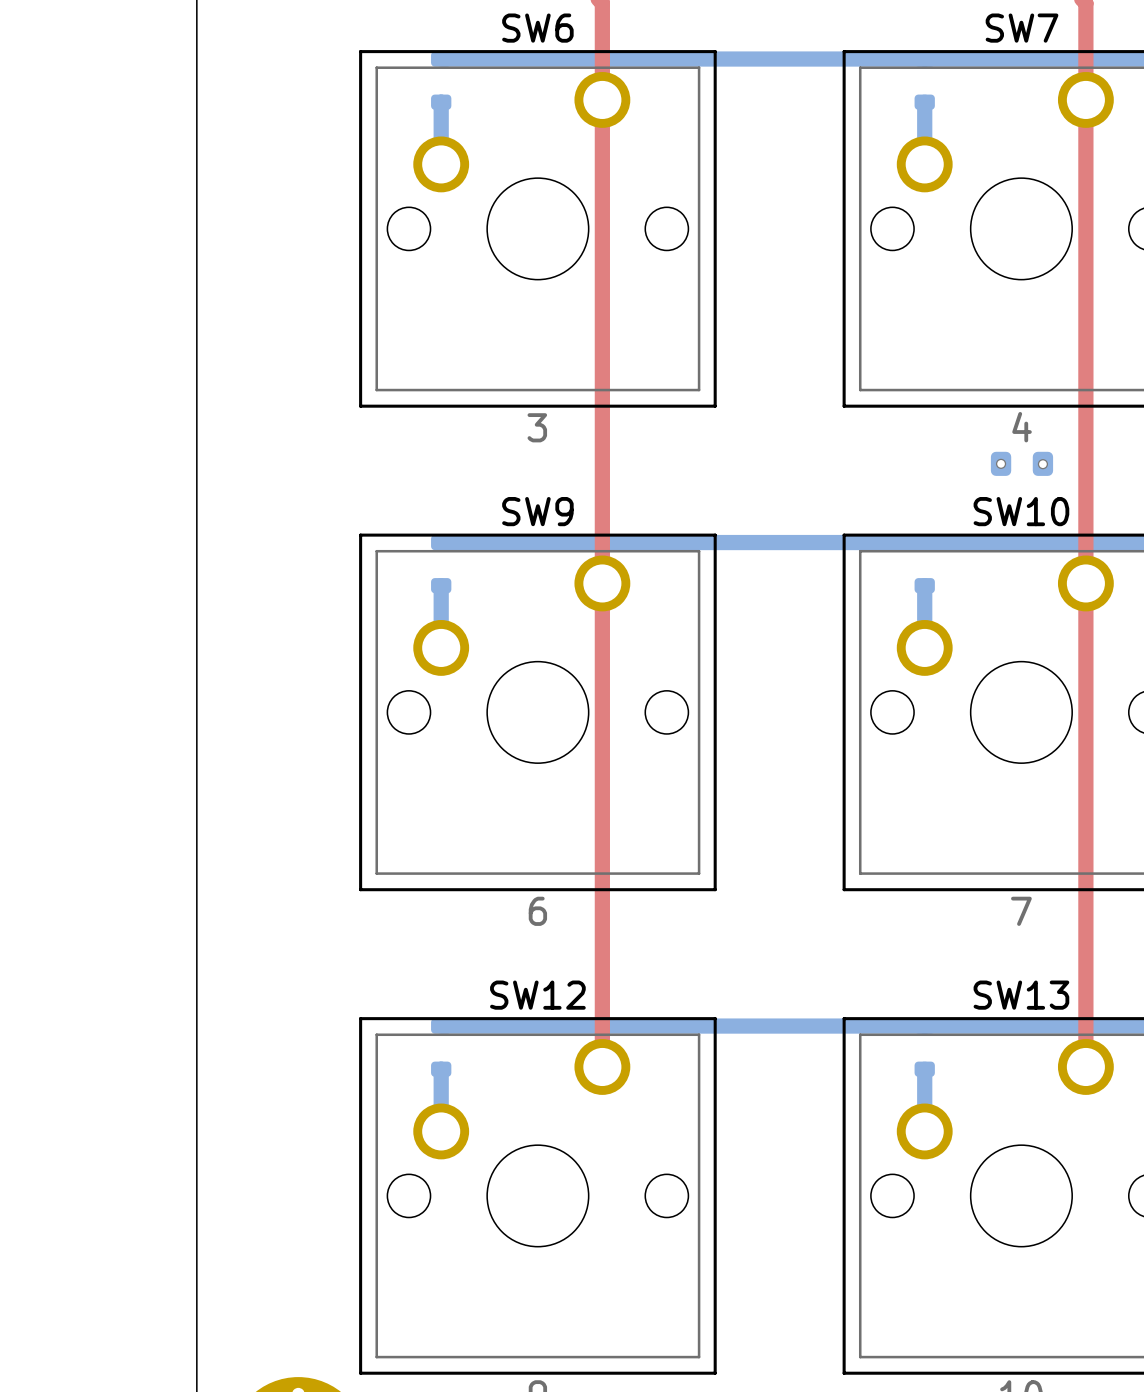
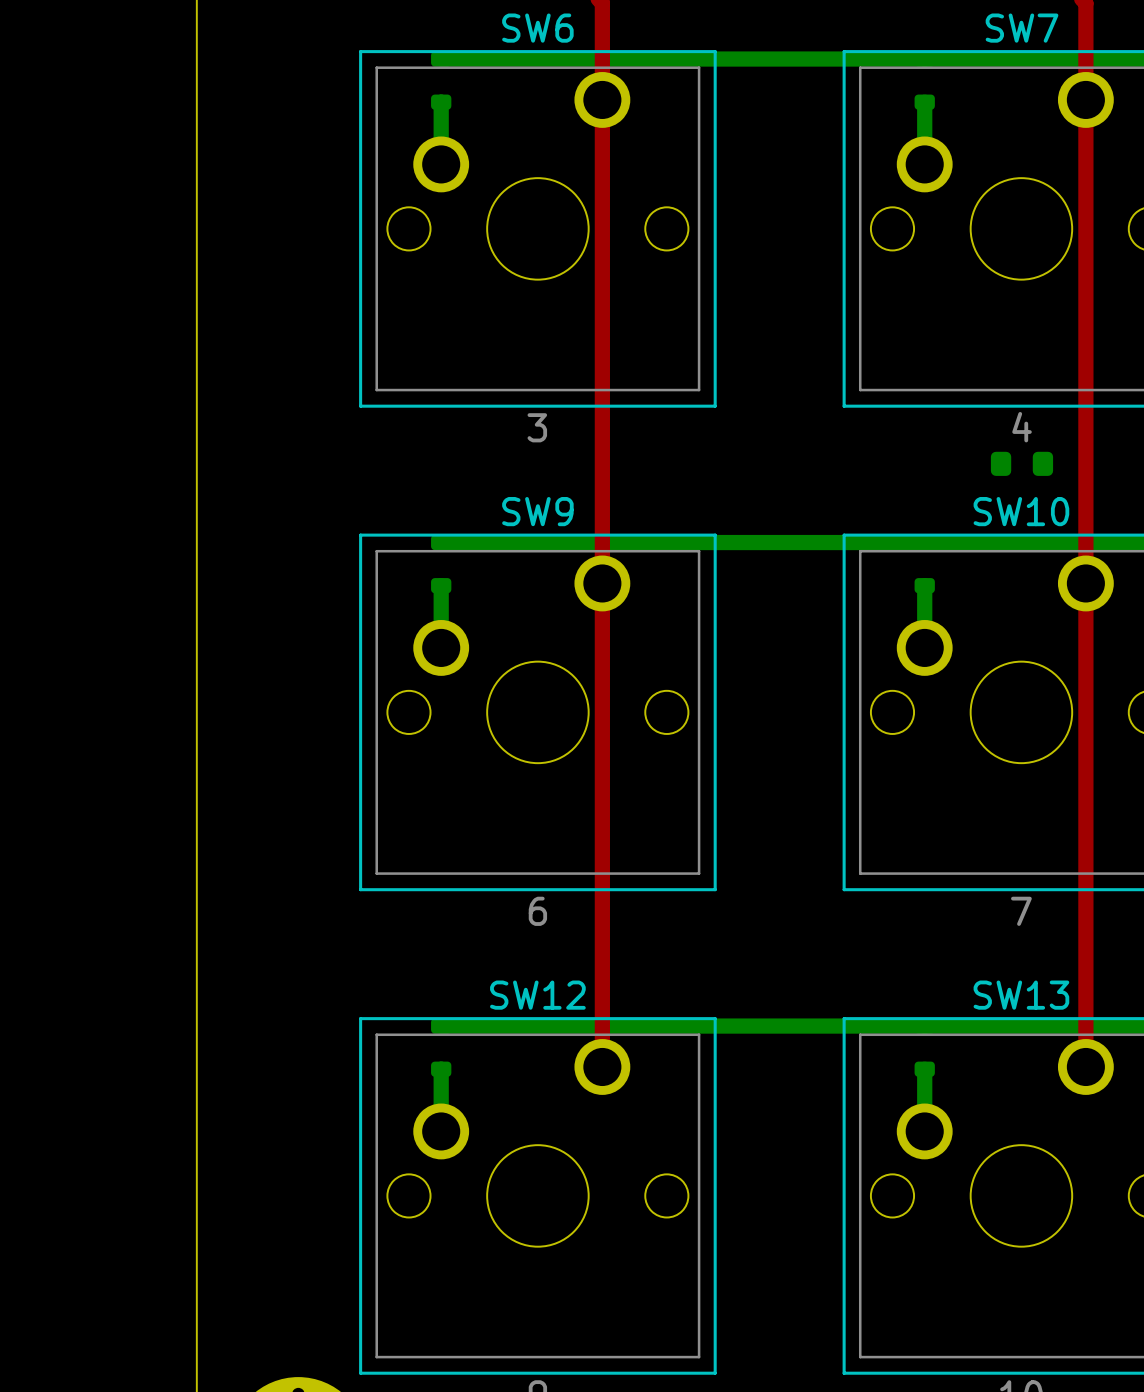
via: (1001, 463) -> none
via: (1042, 464) -> none

